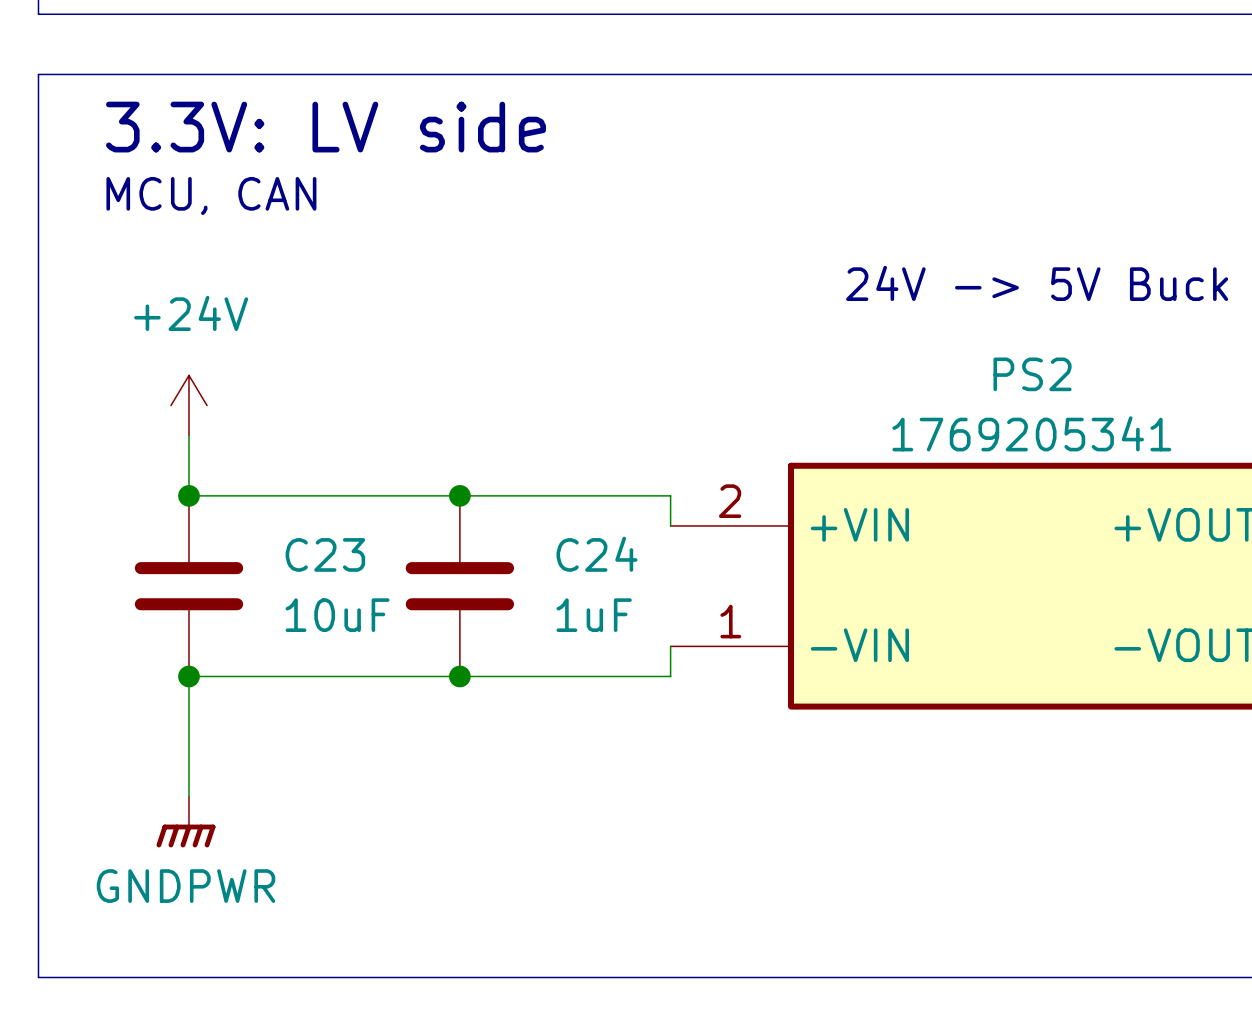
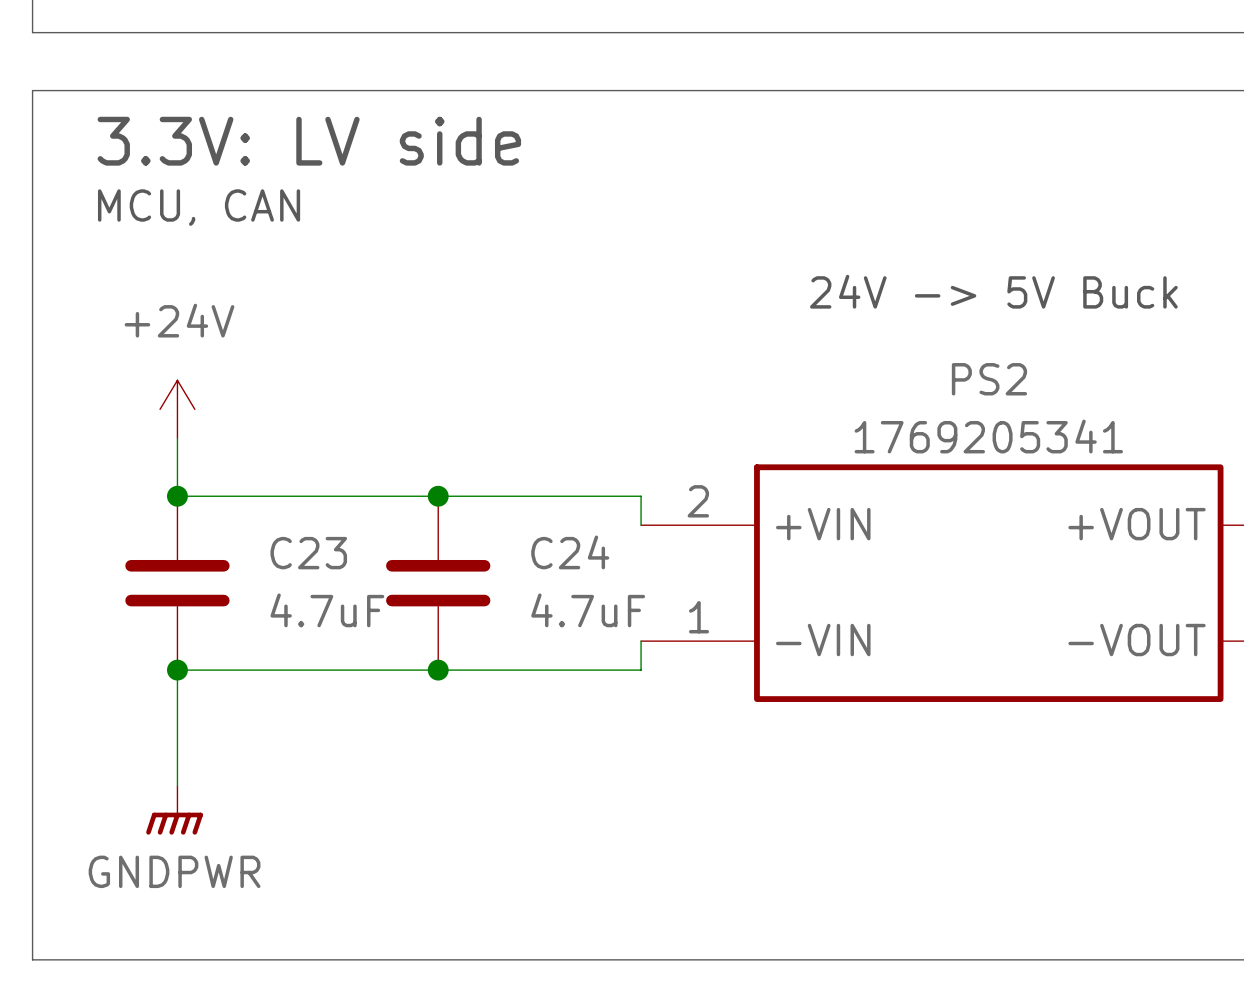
C23 value: 10uF (337, 615) -> 4.7uF (327, 610)
C24 value: 1uF (594, 615) -> 4.7uF (588, 610)

